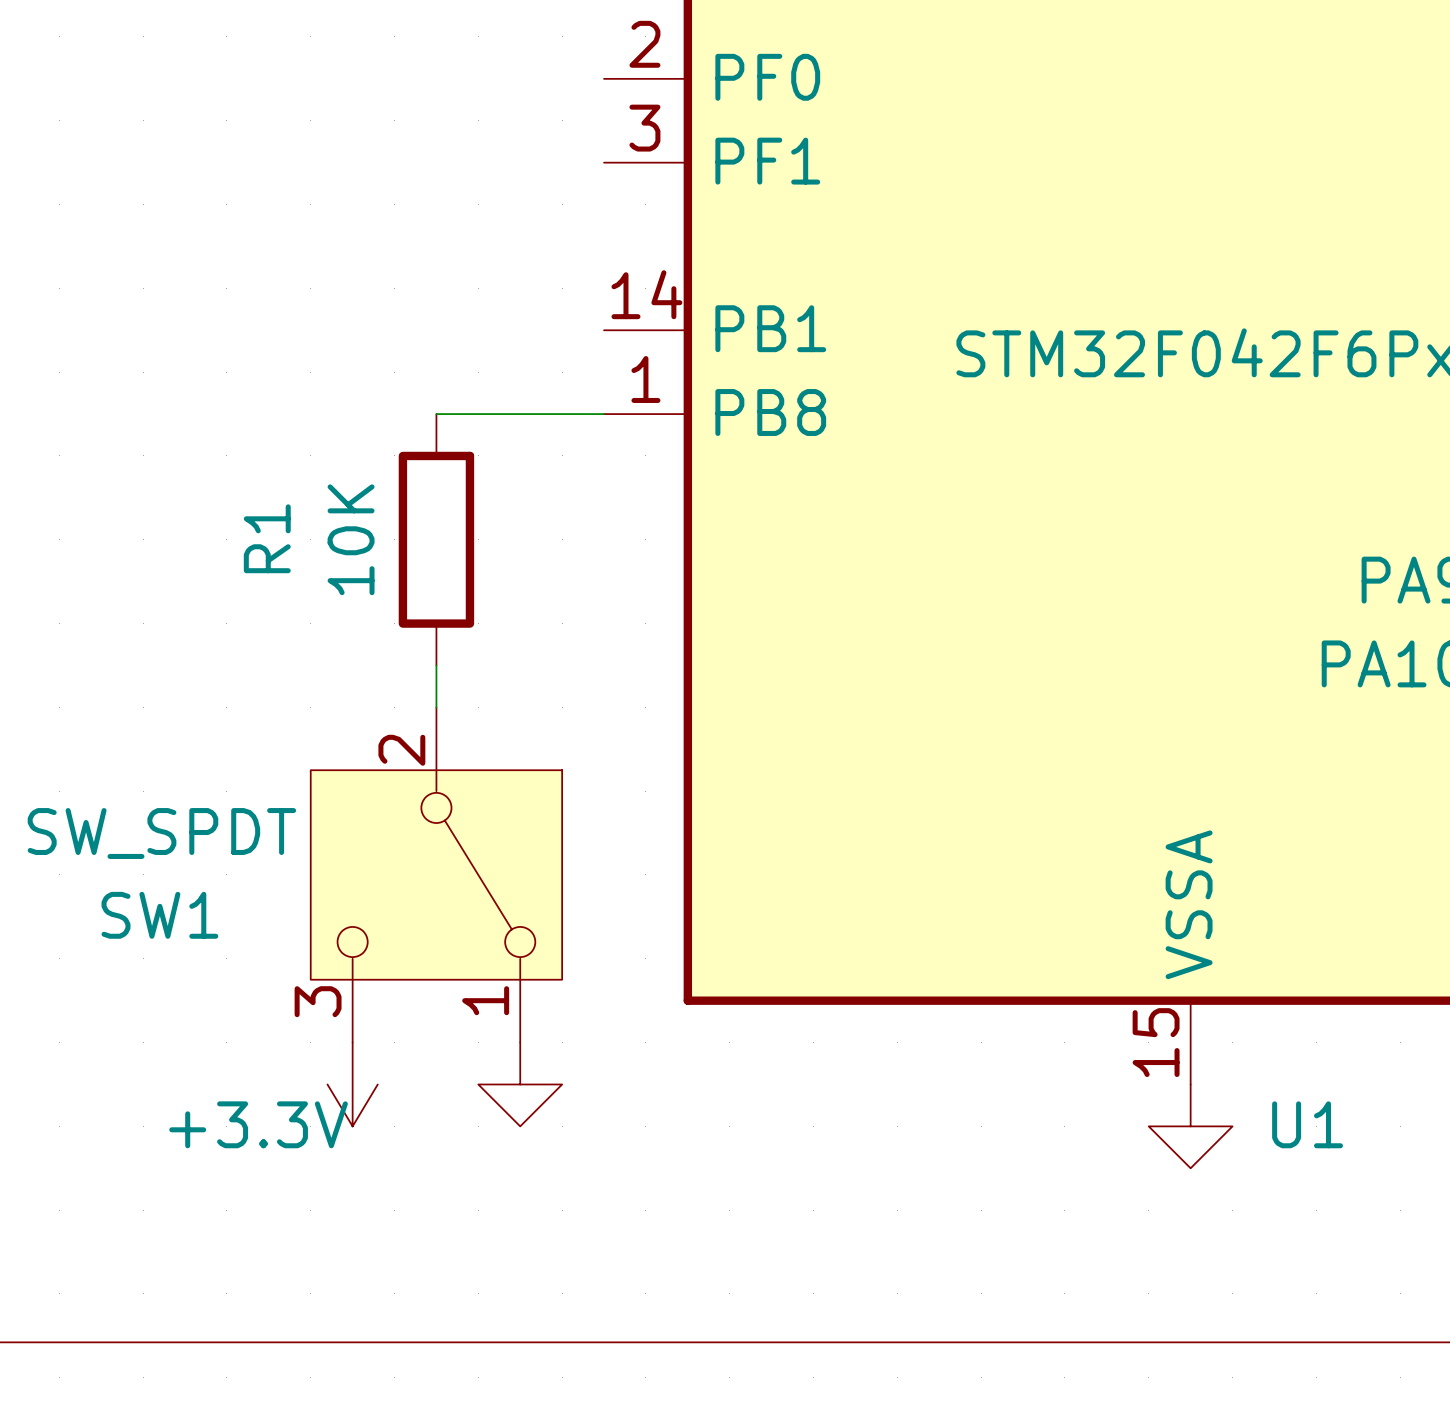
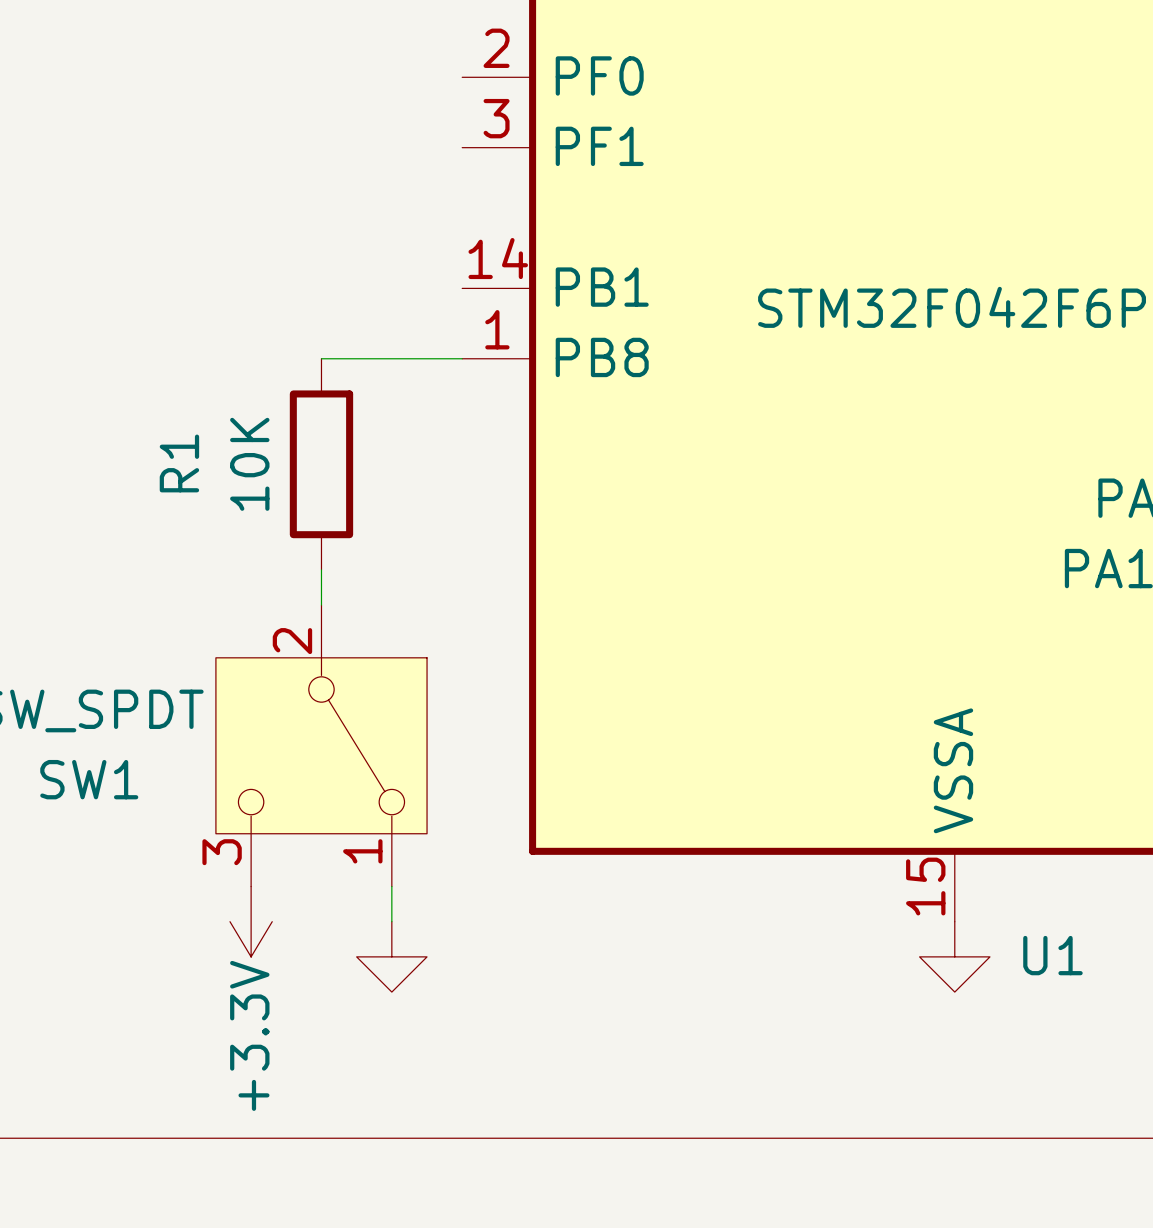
power symbol position: (520, 1084) -> (391, 956)
power symbol text rotation: 0° (258, 1124) -> 90° counterclockwise (249, 1035)

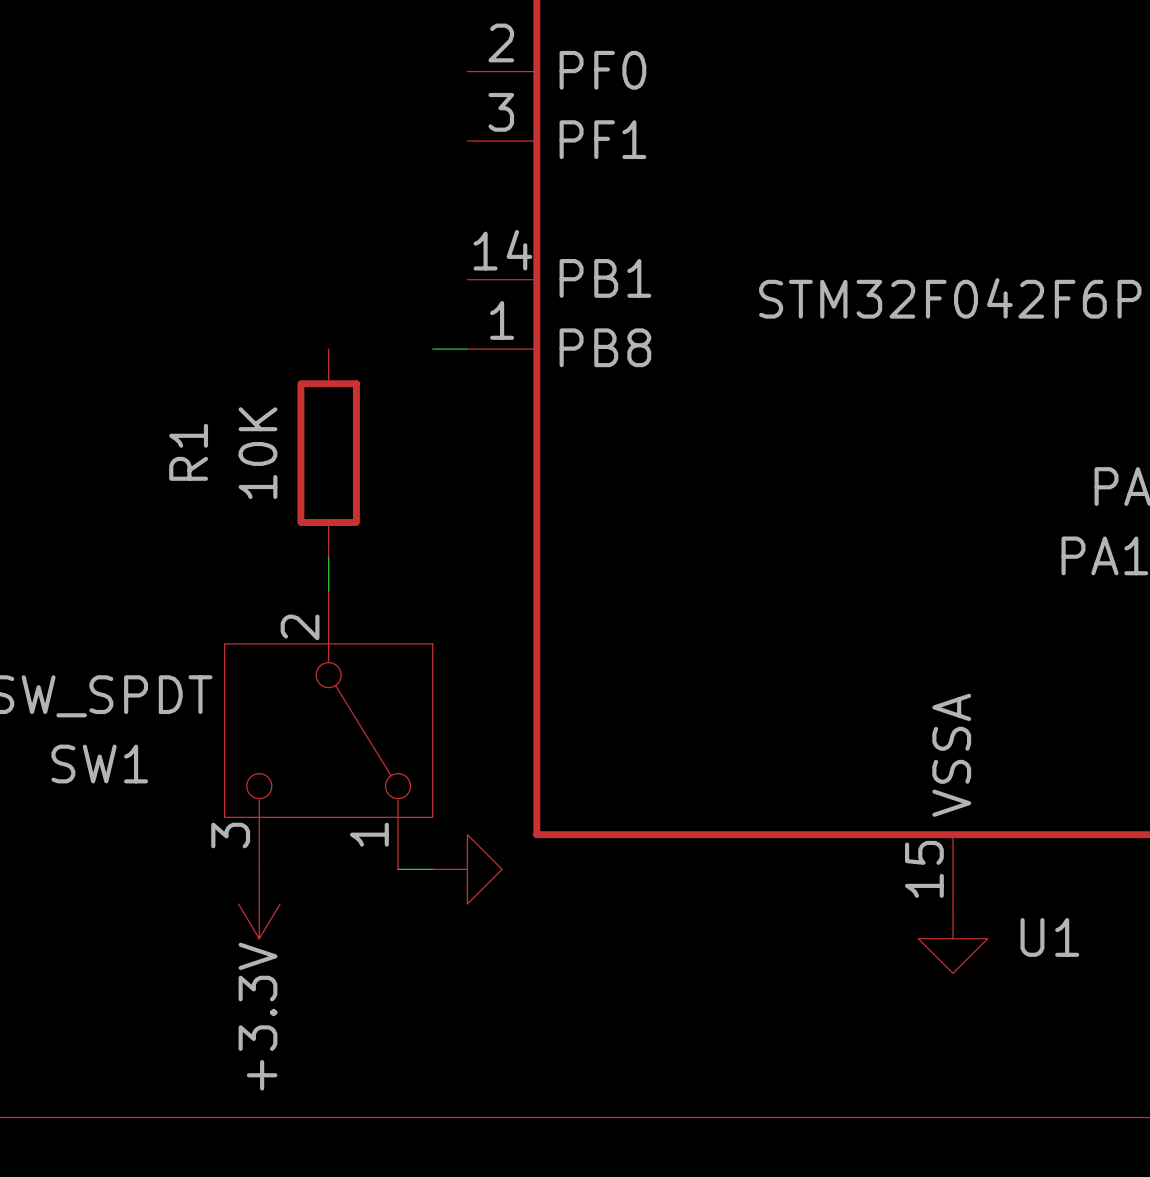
wire: (321, 358) (427, 358) -> none
wire: (391, 886) (391, 921) -> (398, 869) (432, 869)
power symbol rotation: 0° (391, 956) -> 90° counterclockwise (467, 869)
power symbol position: (391, 956) -> (467, 869)

